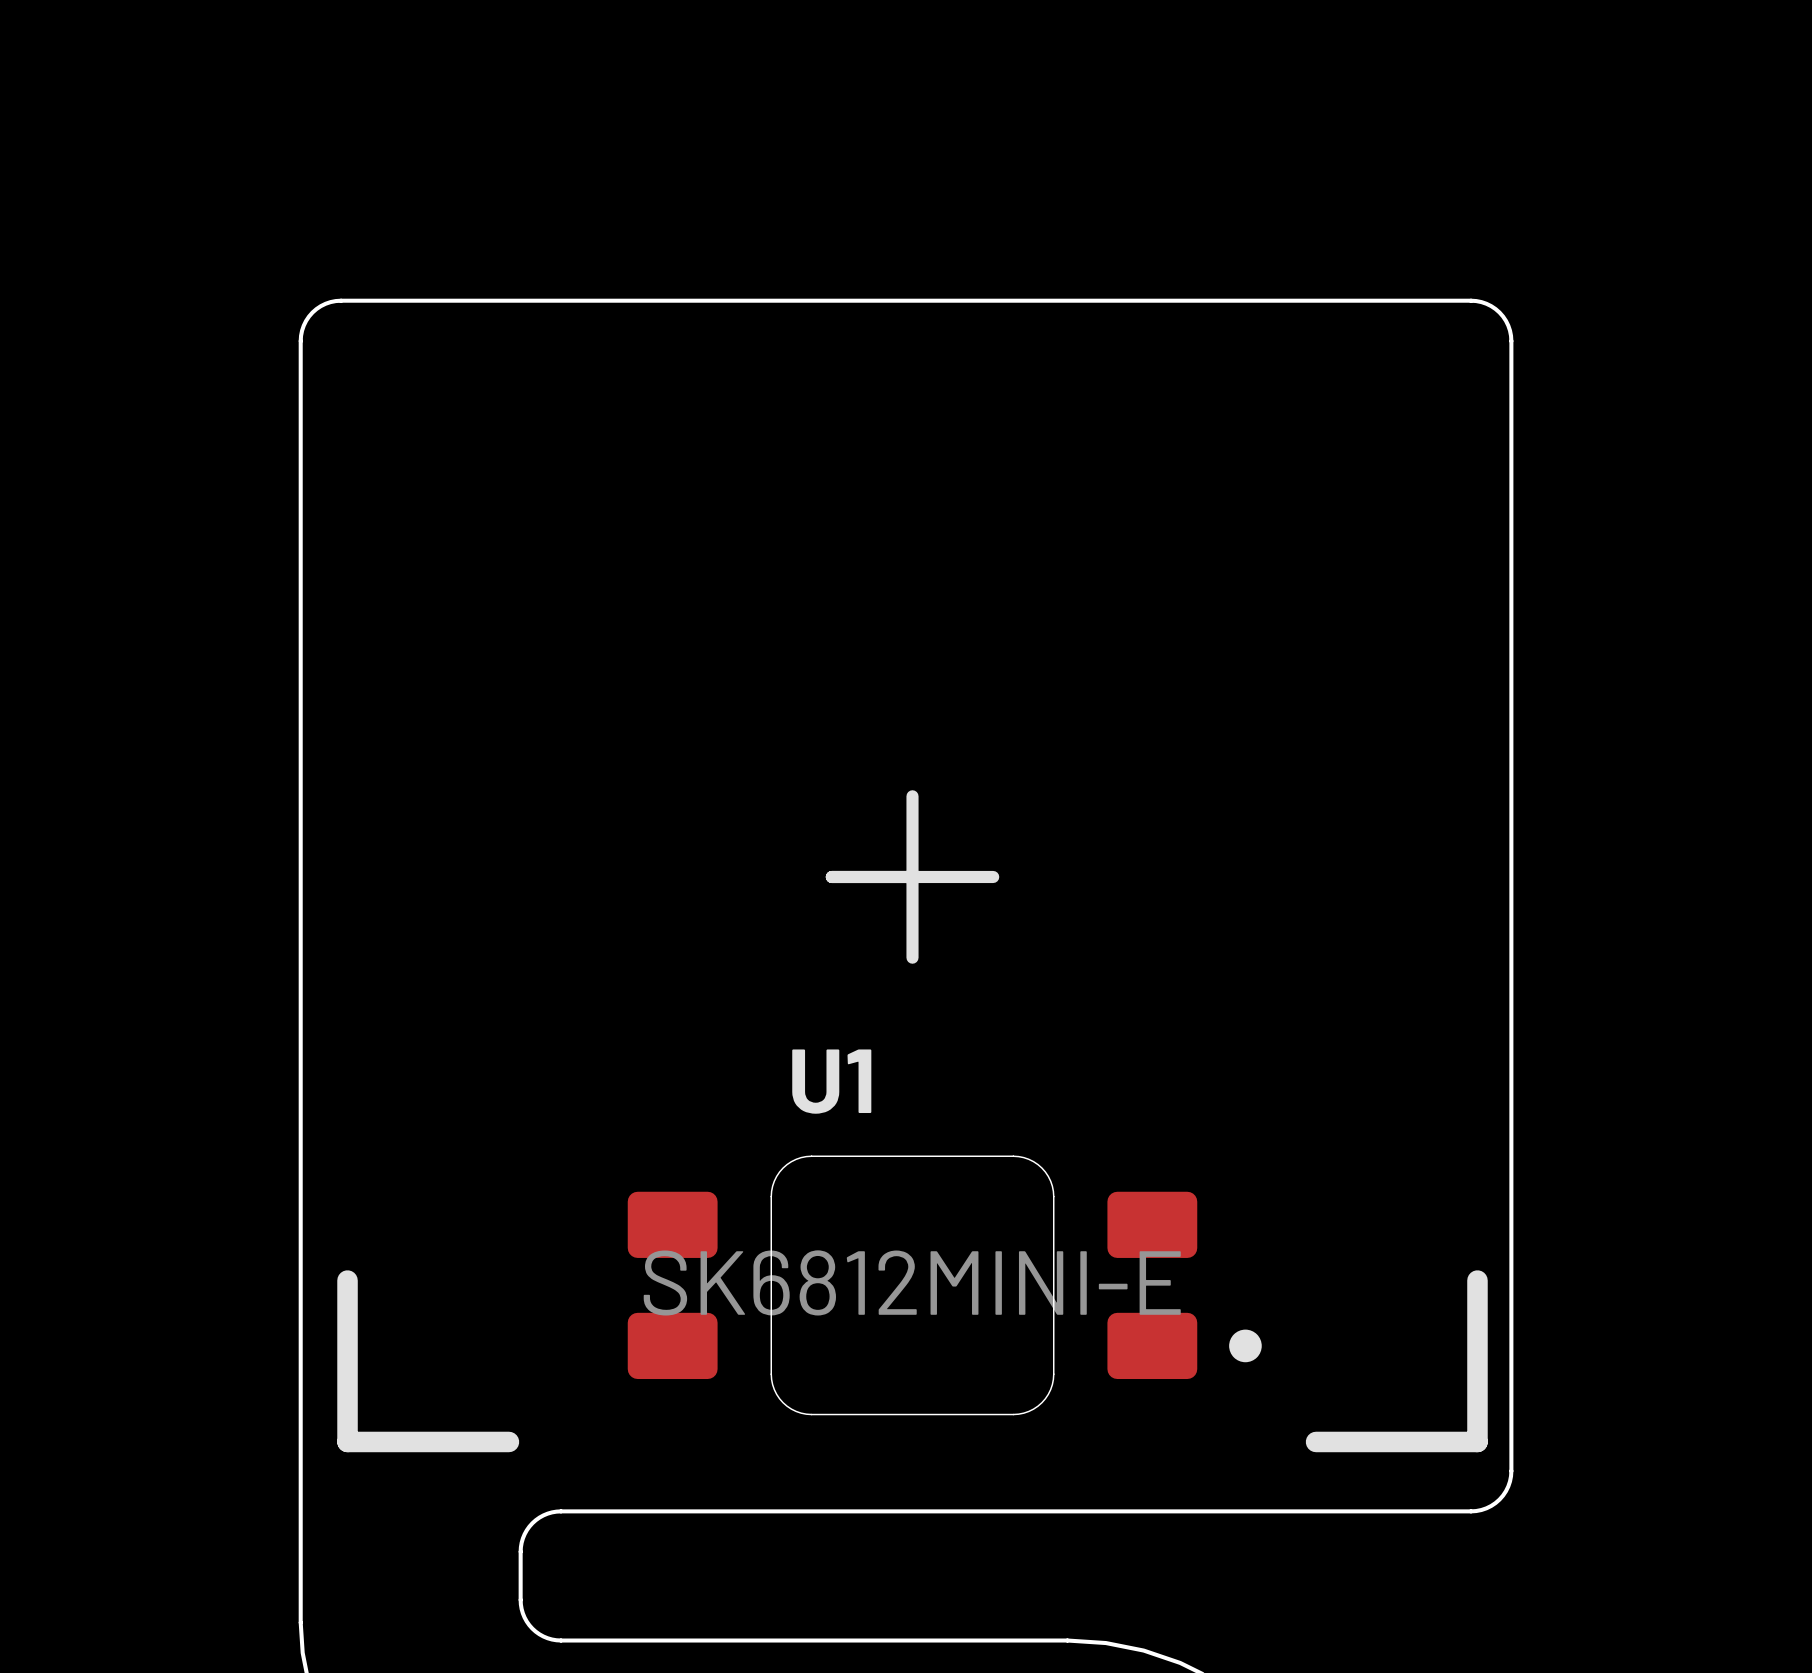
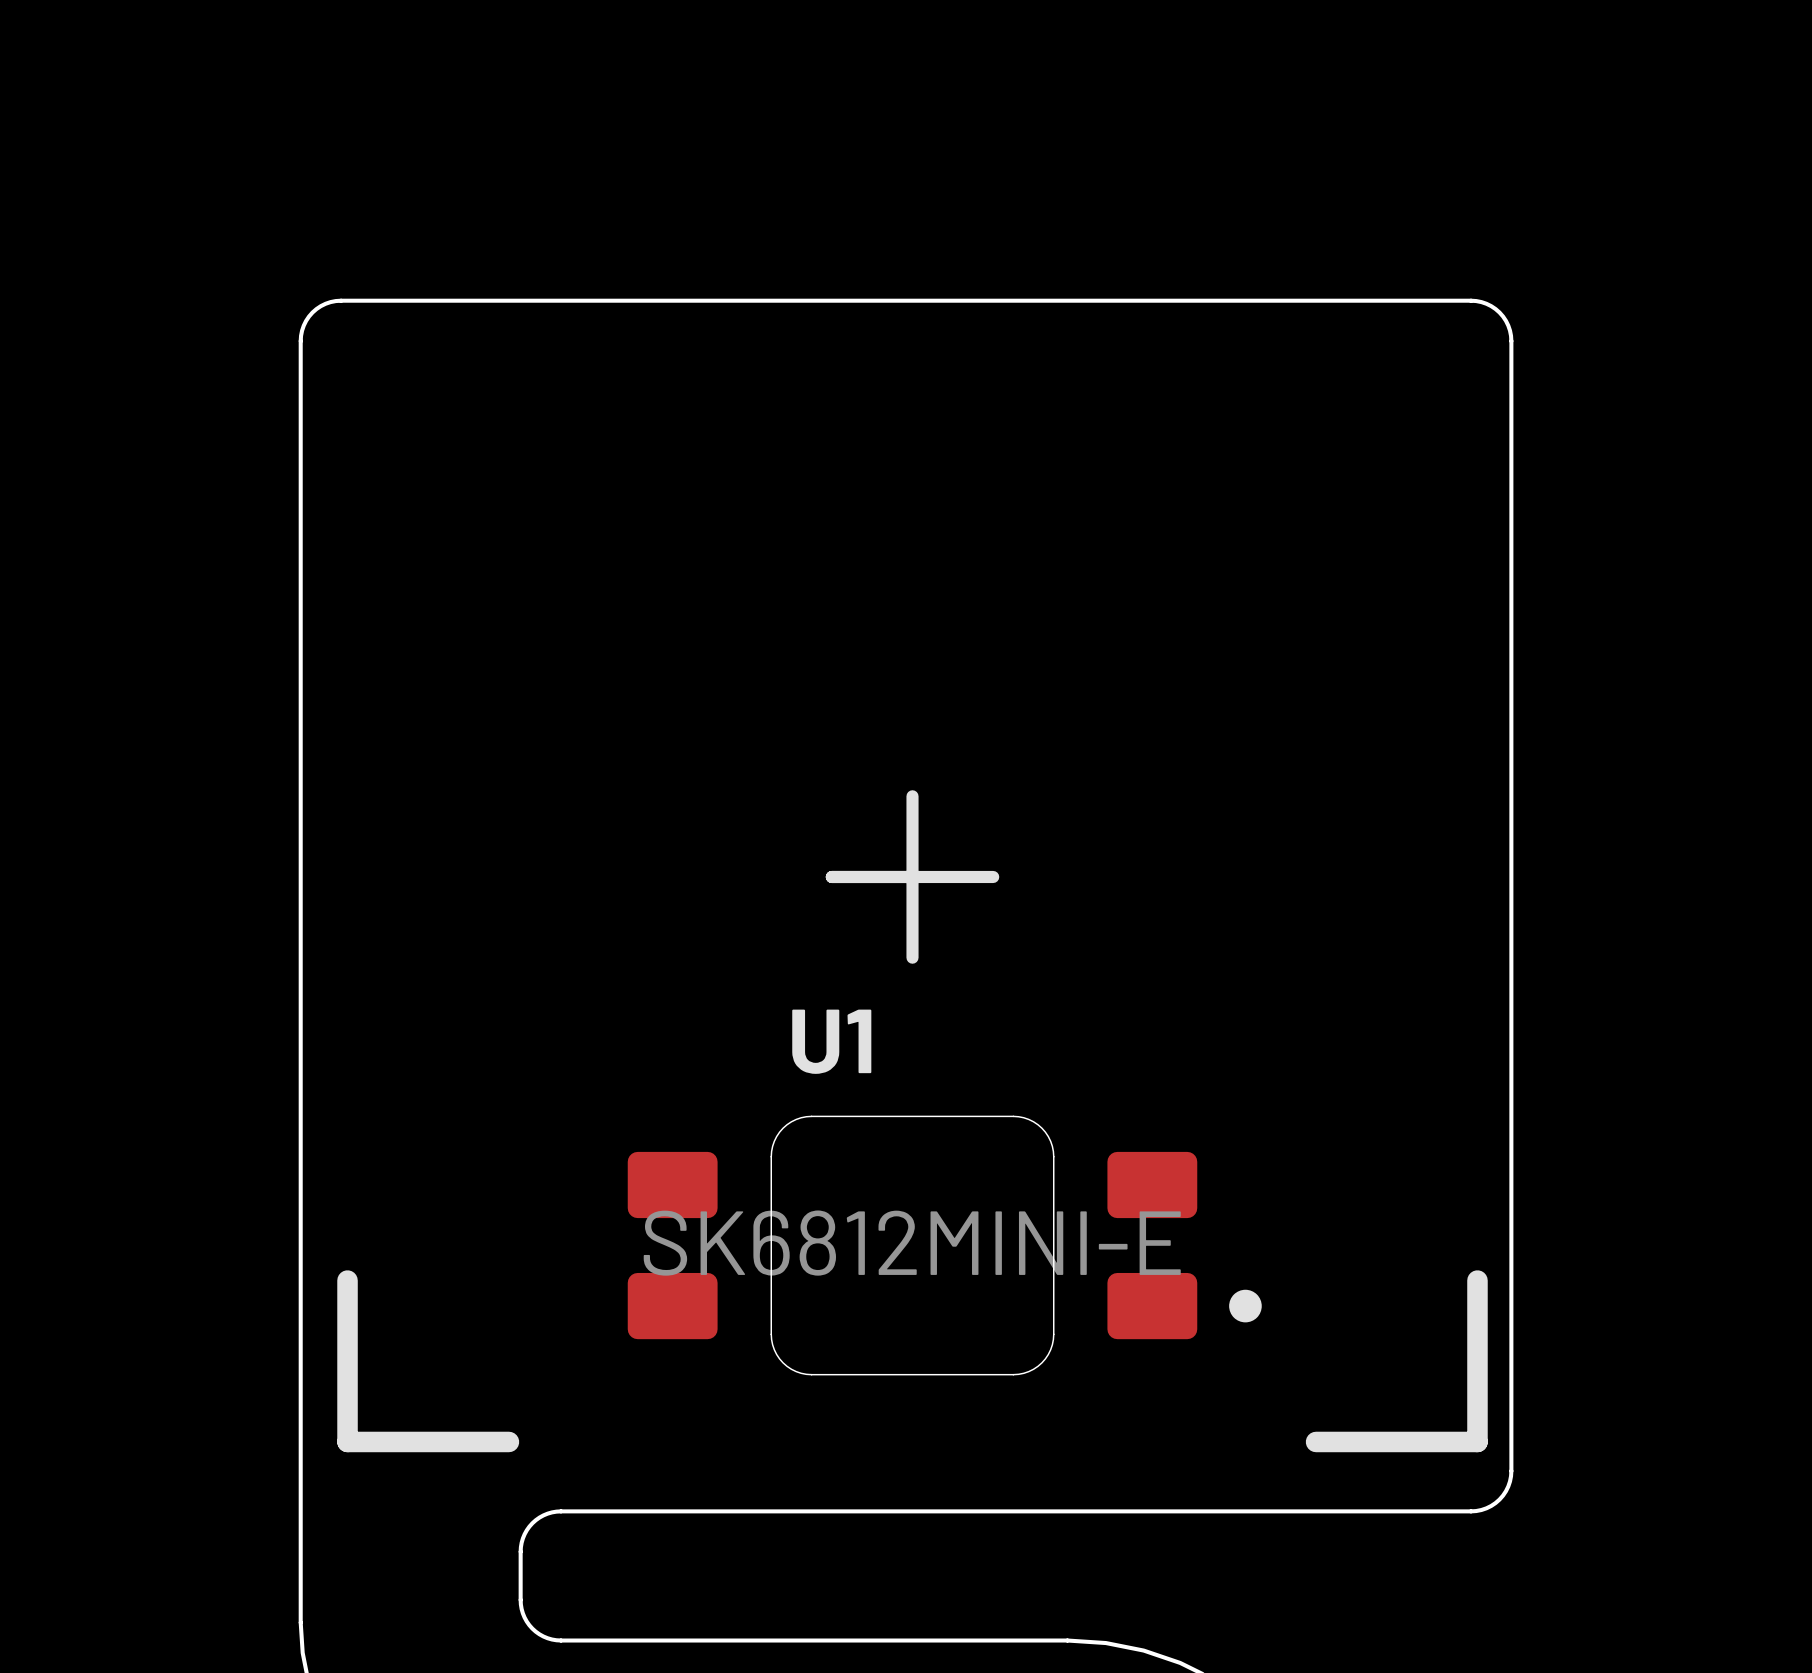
U1 position: (944, 1285) -> (944, 1245)

